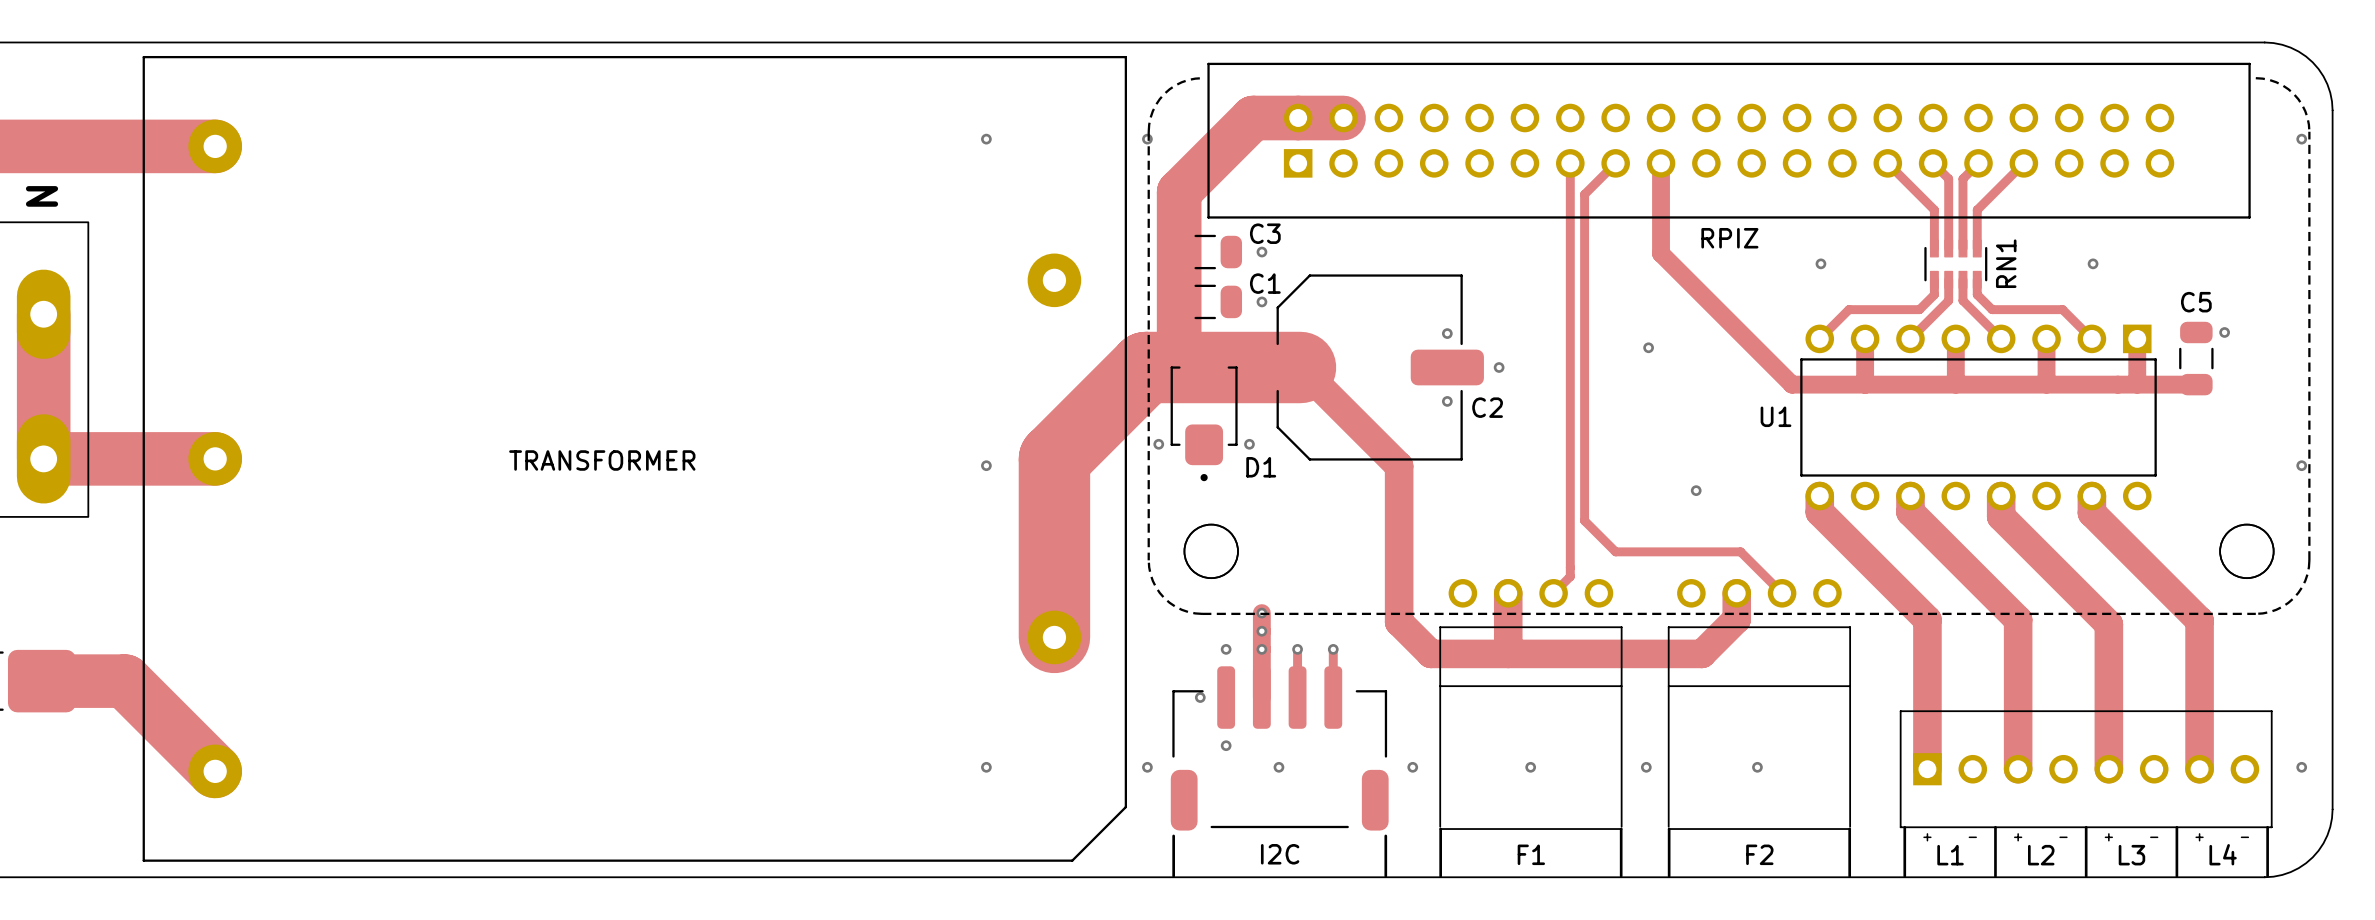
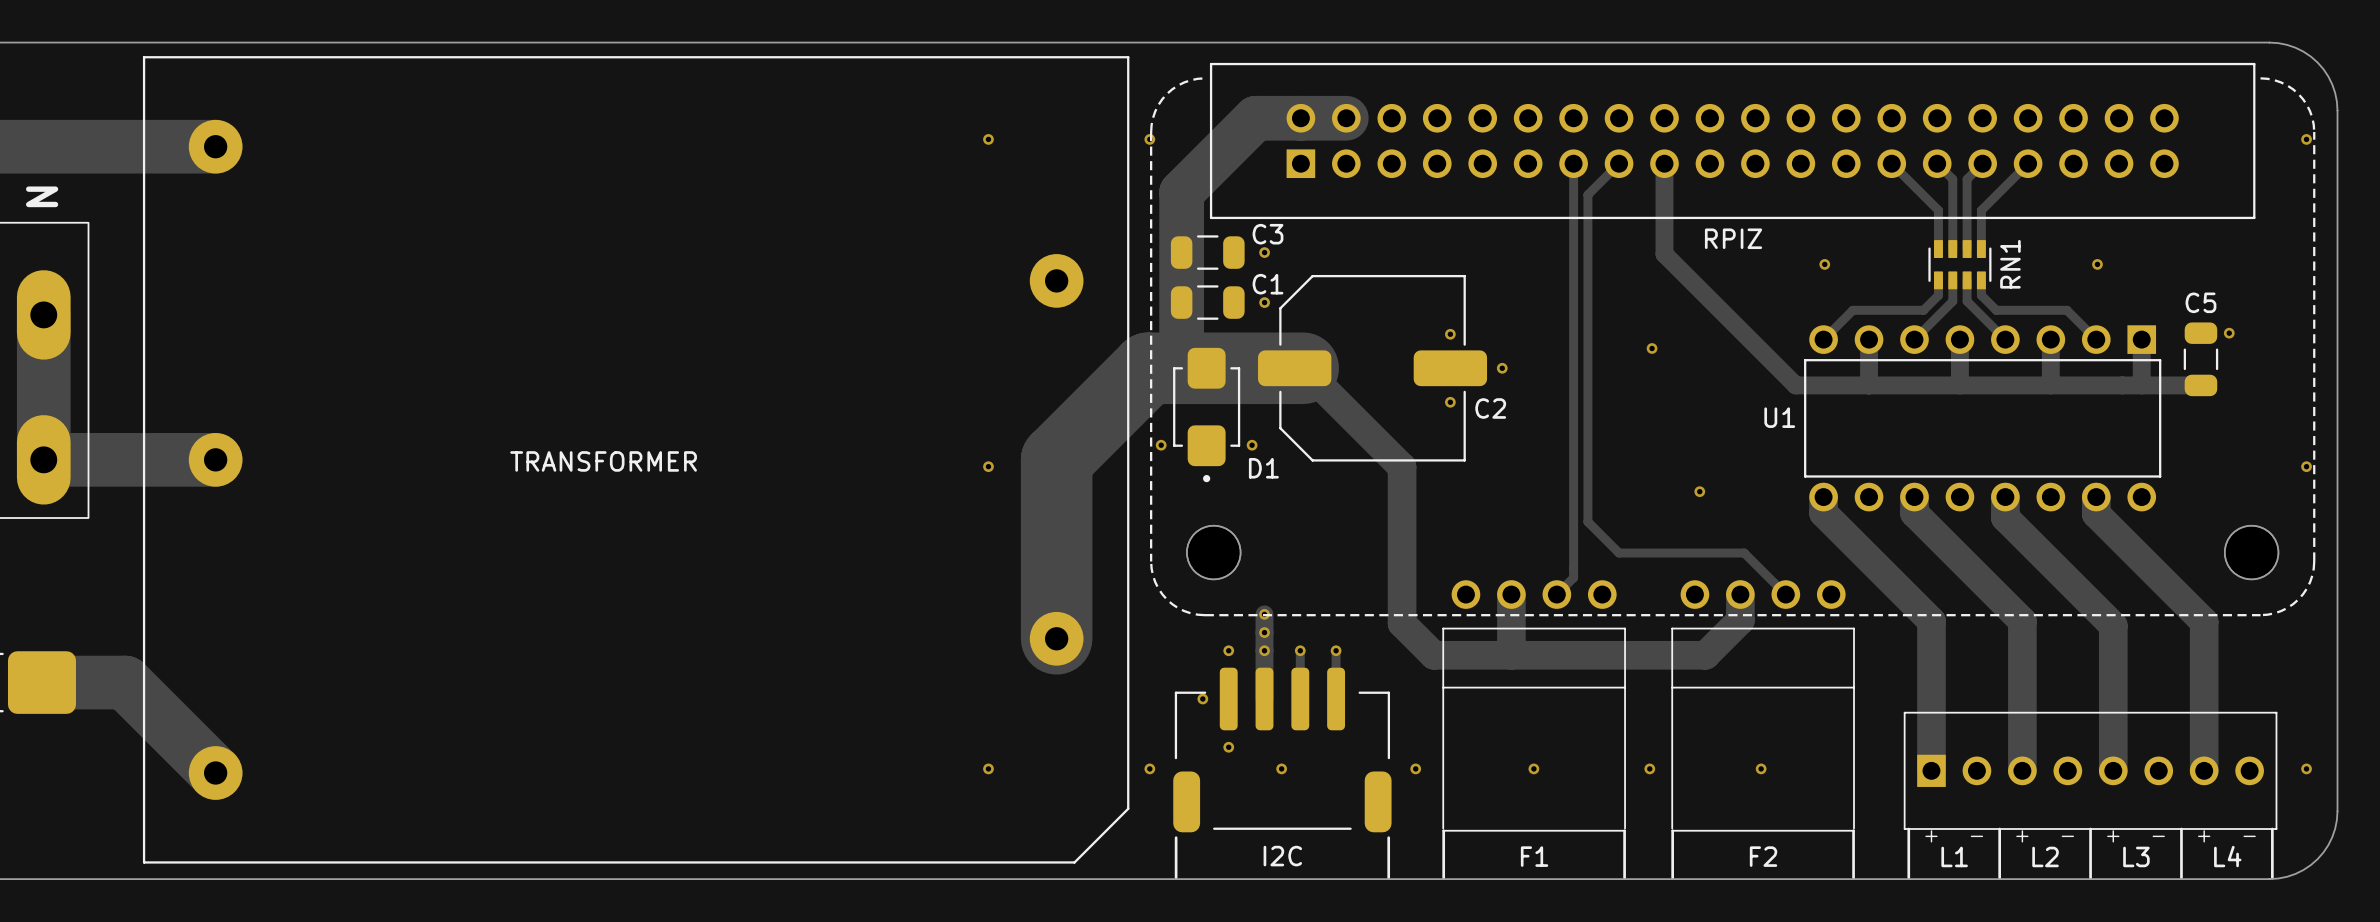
part footprint: [1899, 710, 2273, 878] -> [1903, 711, 2278, 880]

